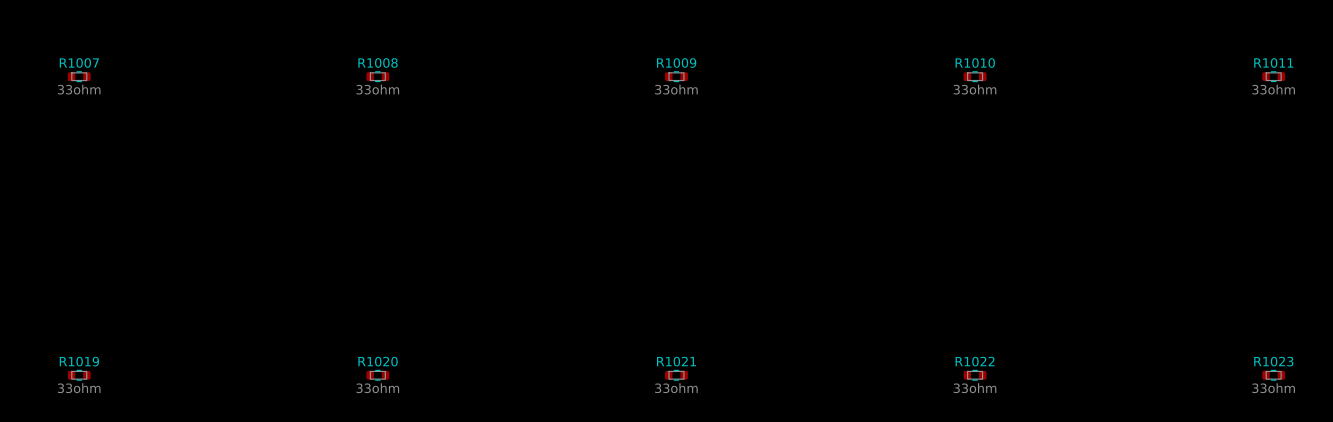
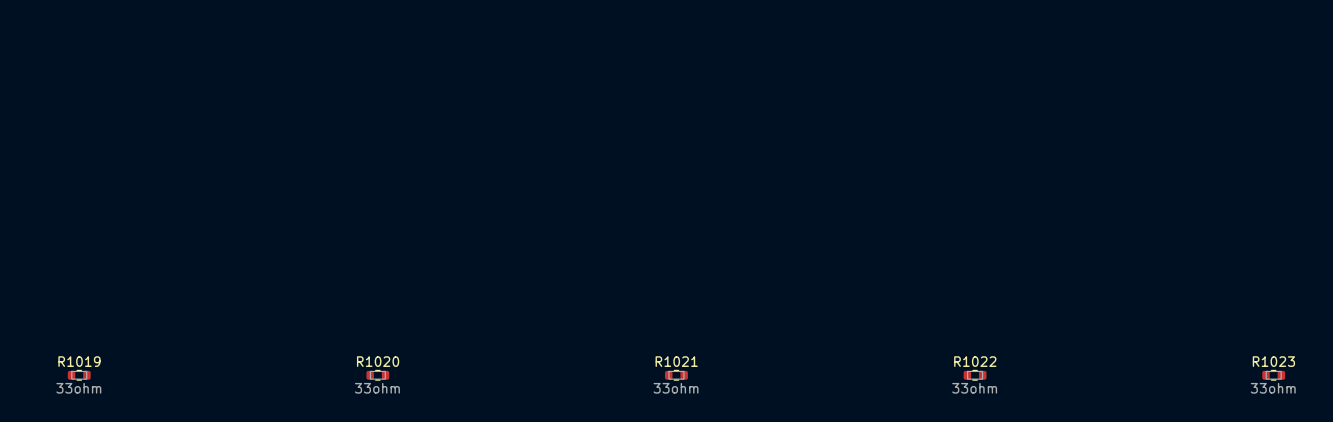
R1007: 33ohm (79, 76) -> none
R1008: 33ohm (377, 76) -> none
R1009: 33ohm (676, 76) -> none
R1010: 33ohm (975, 76) -> none
R1011: 33ohm (1273, 76) -> none

